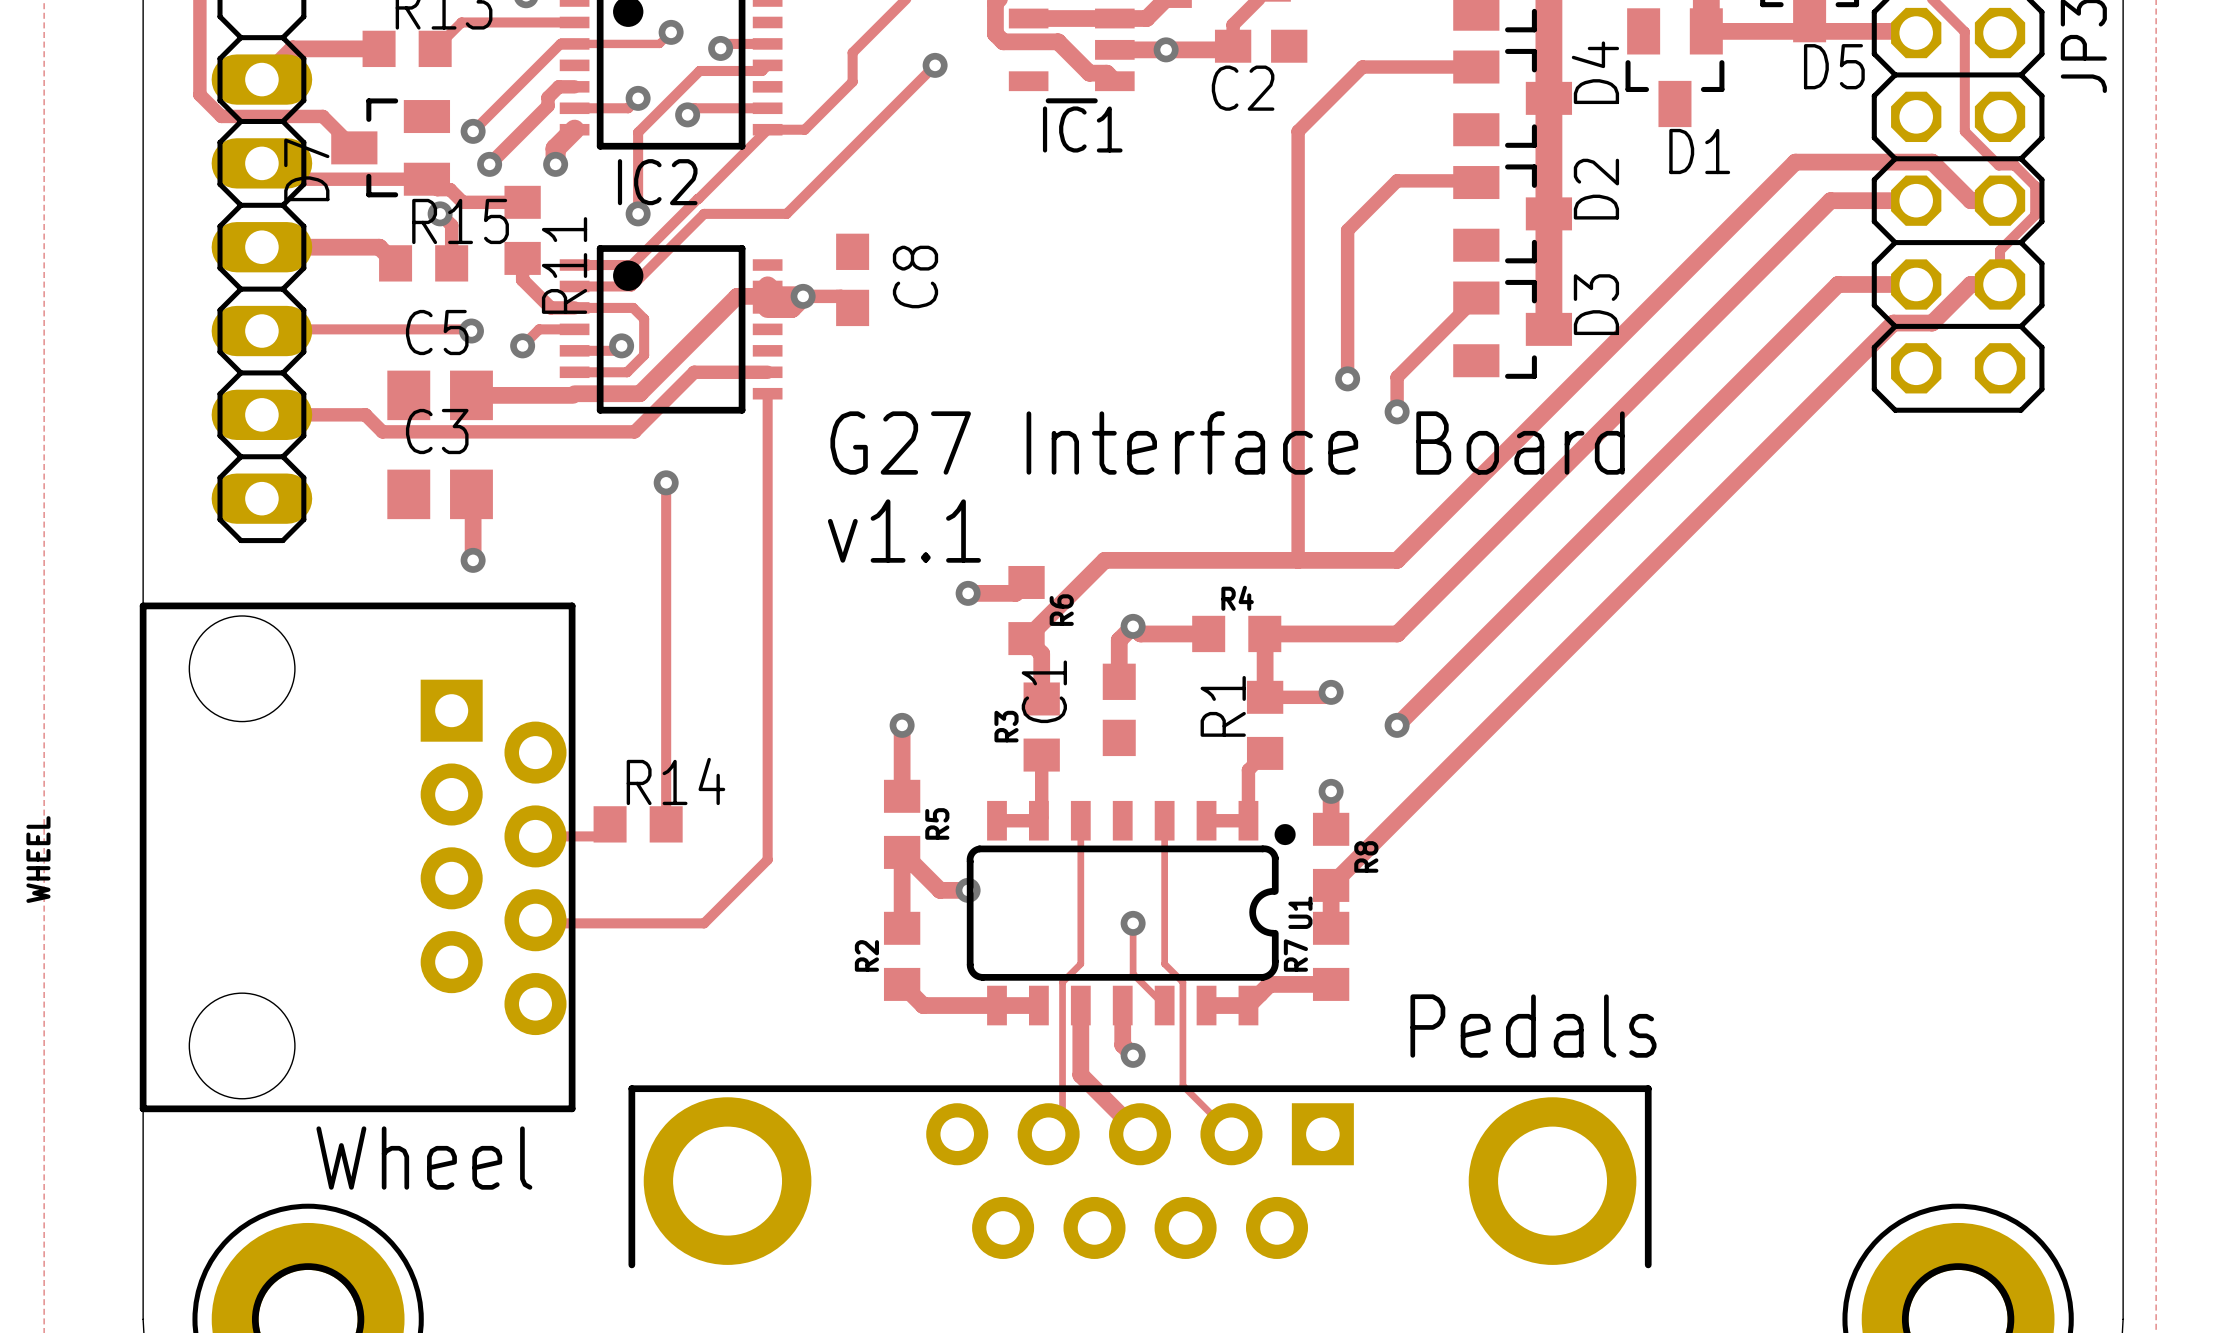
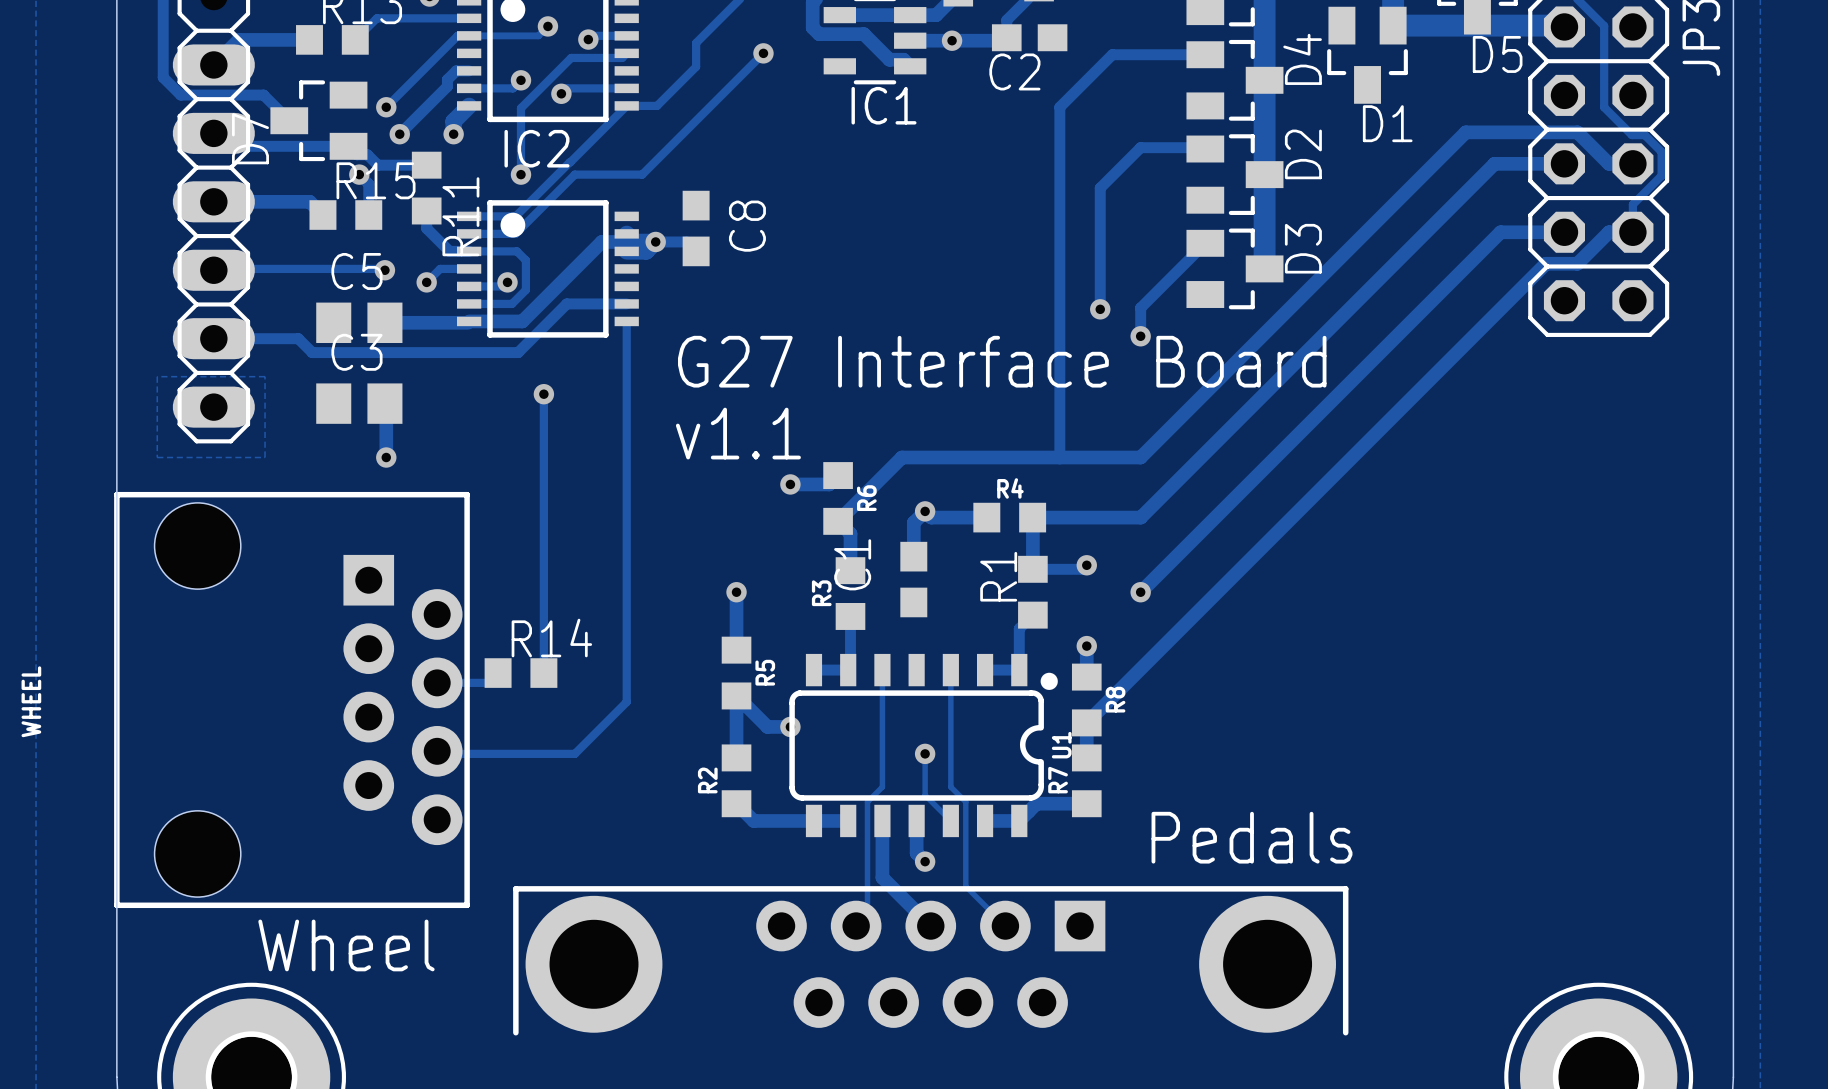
track width: thin (1706, 31) (1914, 31) -> thick (1393, 25) (1563, 25)
zone outline: none -> (157, 376) (157, 457) (265, 457) (265, 376) (157, 376)

